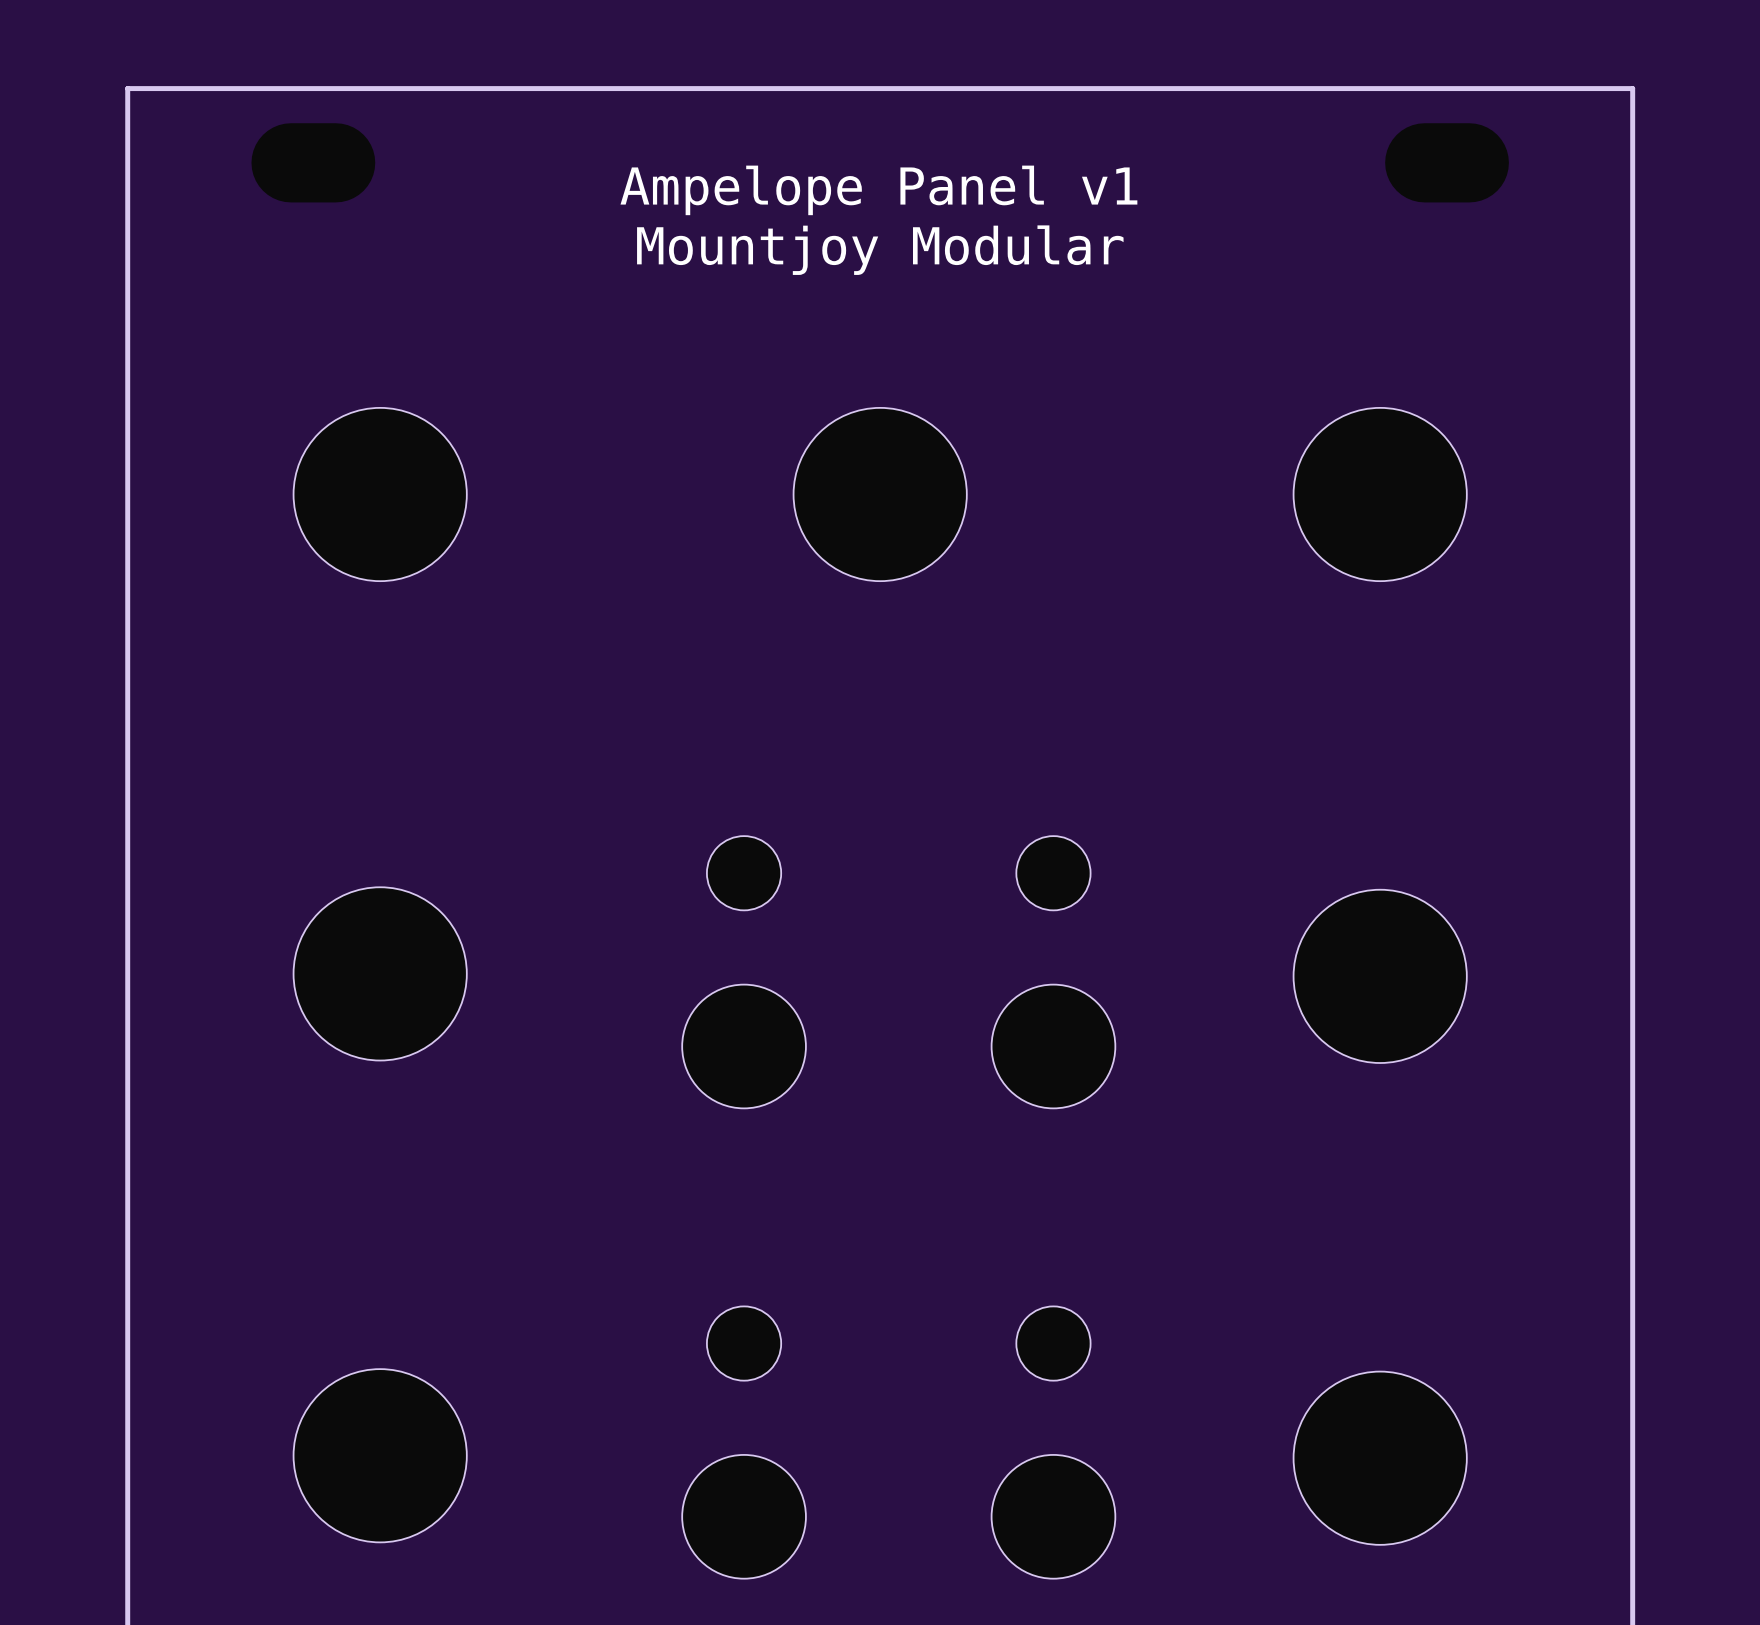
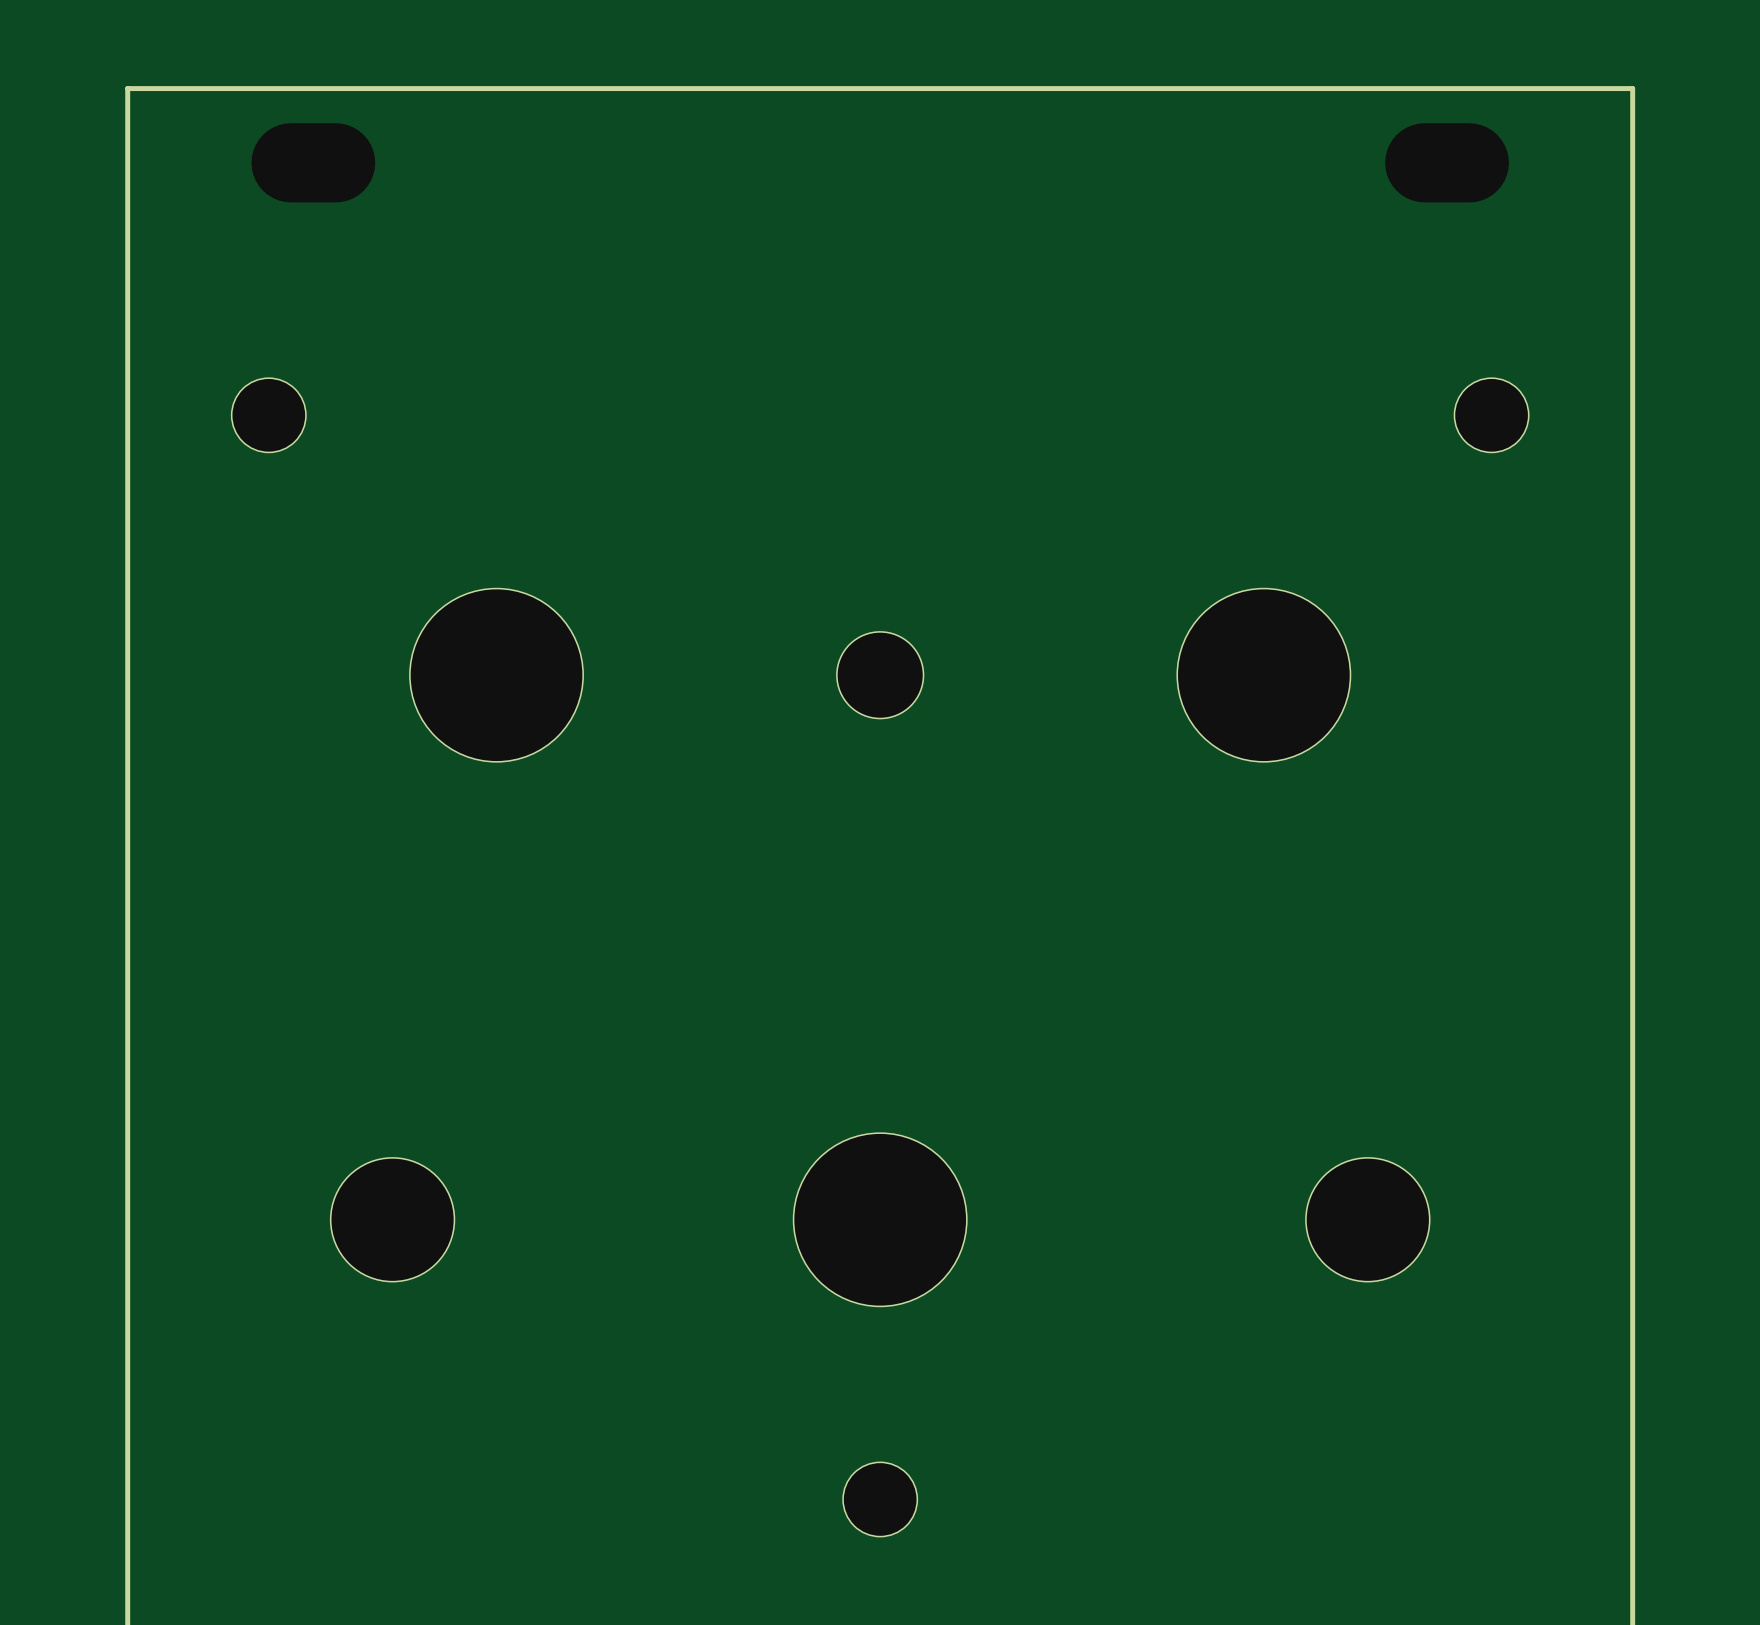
text: Ampelope Panel v1 (878, 190) -> none
text: Mountjoy Modular (880, 250) -> none
part: none -> (268, 415)
part: none -> (1491, 415)
part: (380, 494) -> none
part: (880, 494) -> none
part: (1380, 494) -> none
part: none -> (496, 675)
part: none -> (880, 675)
part: none -> (1263, 675)
part: (744, 873) -> none
part: (1053, 873) -> none
part: (380, 973) -> none
part: (1380, 976) -> none
part: (744, 1046) -> none
part: (1053, 1046) -> none
part: none -> (392, 1219)
part: none -> (880, 1219)
part: none -> (1367, 1219)
part: (744, 1343) -> none
part: (1053, 1343) -> none
part: (380, 1455) -> none
part: (1380, 1458) -> none
part: none -> (880, 1499)
part: (744, 1516) -> none
part: (1053, 1516) -> none

